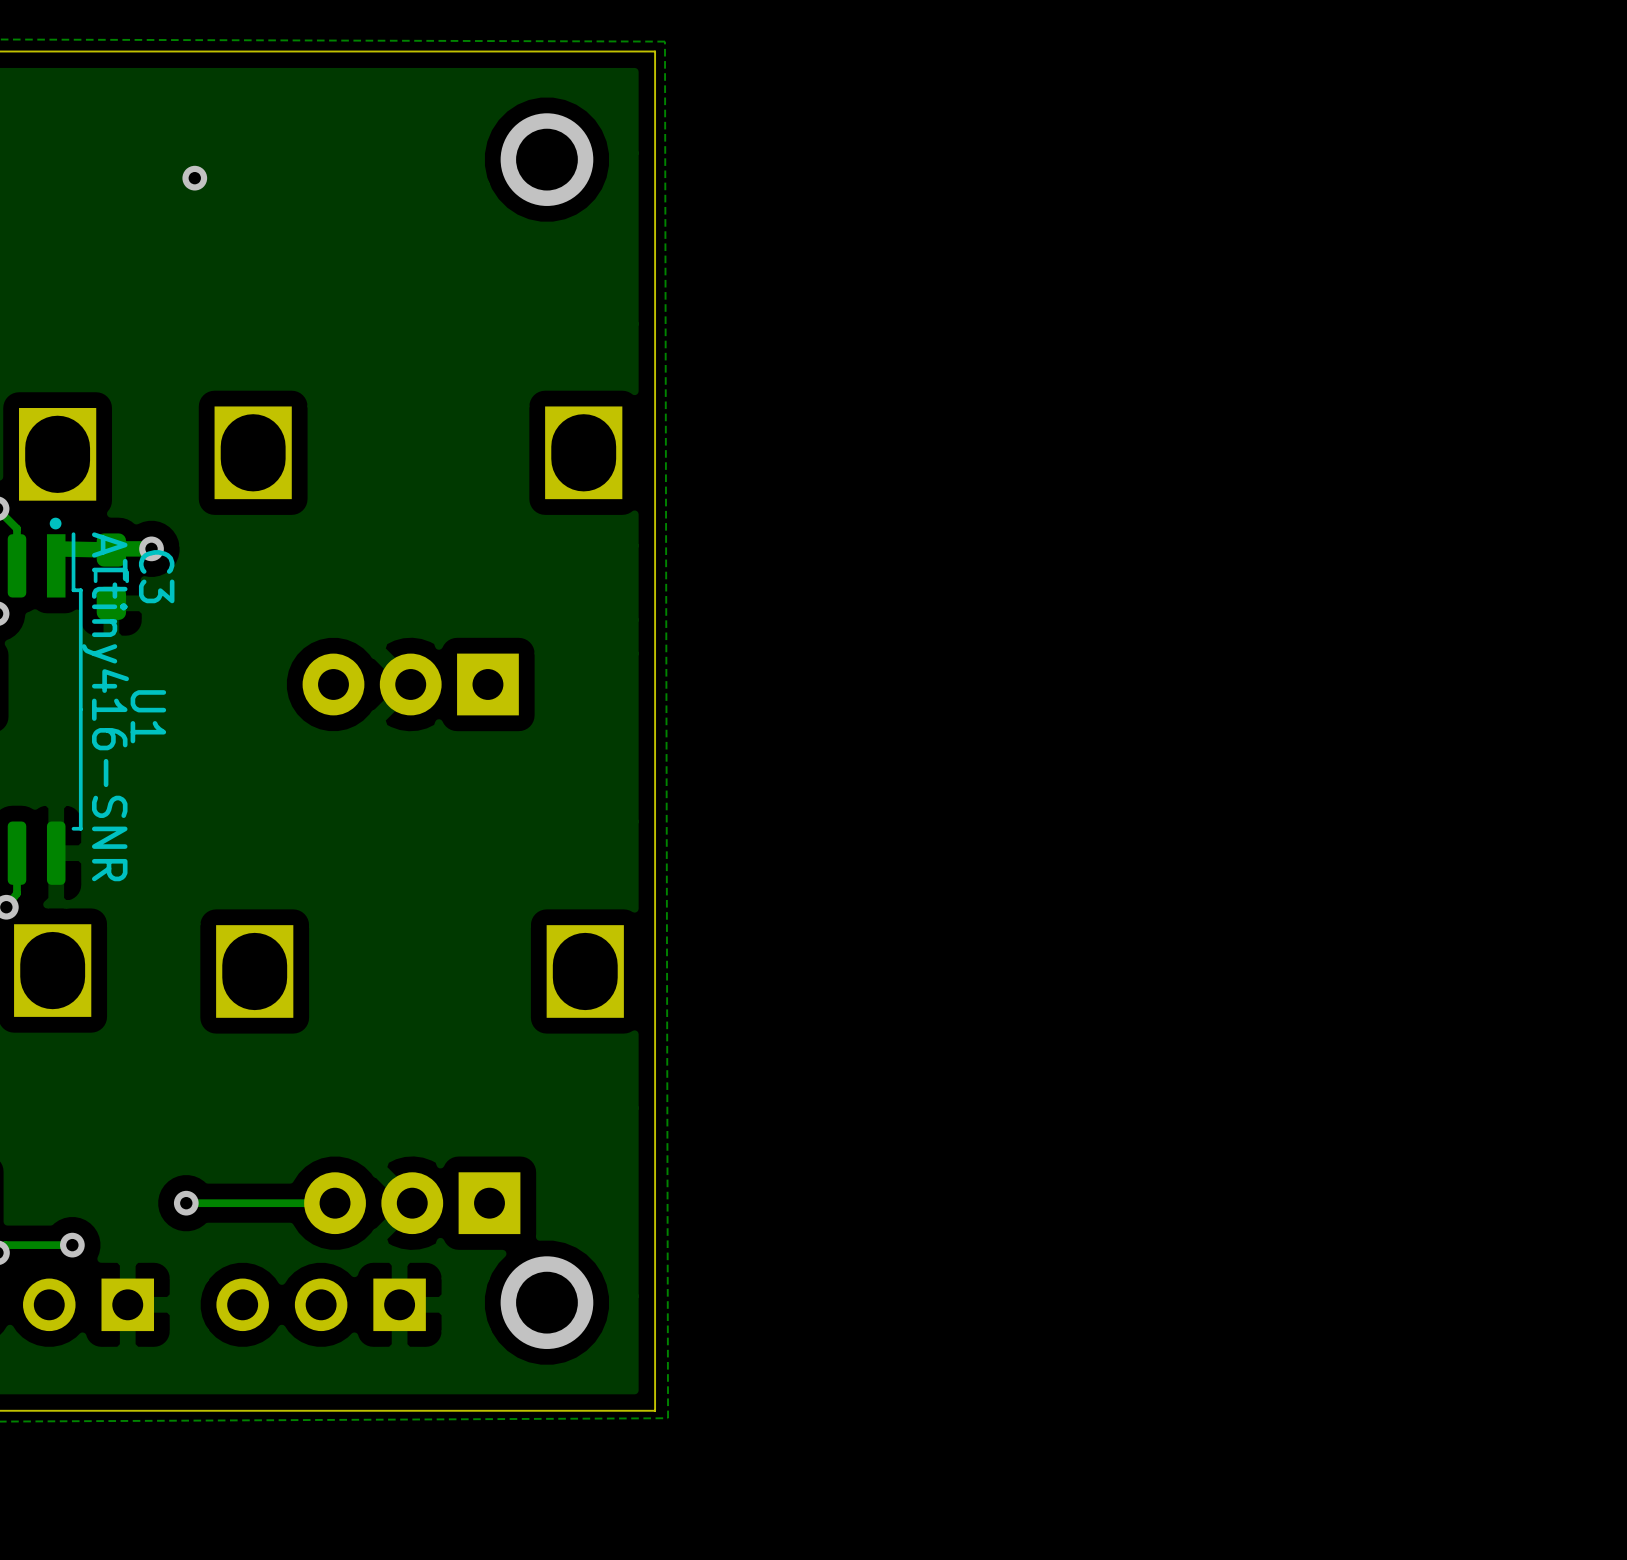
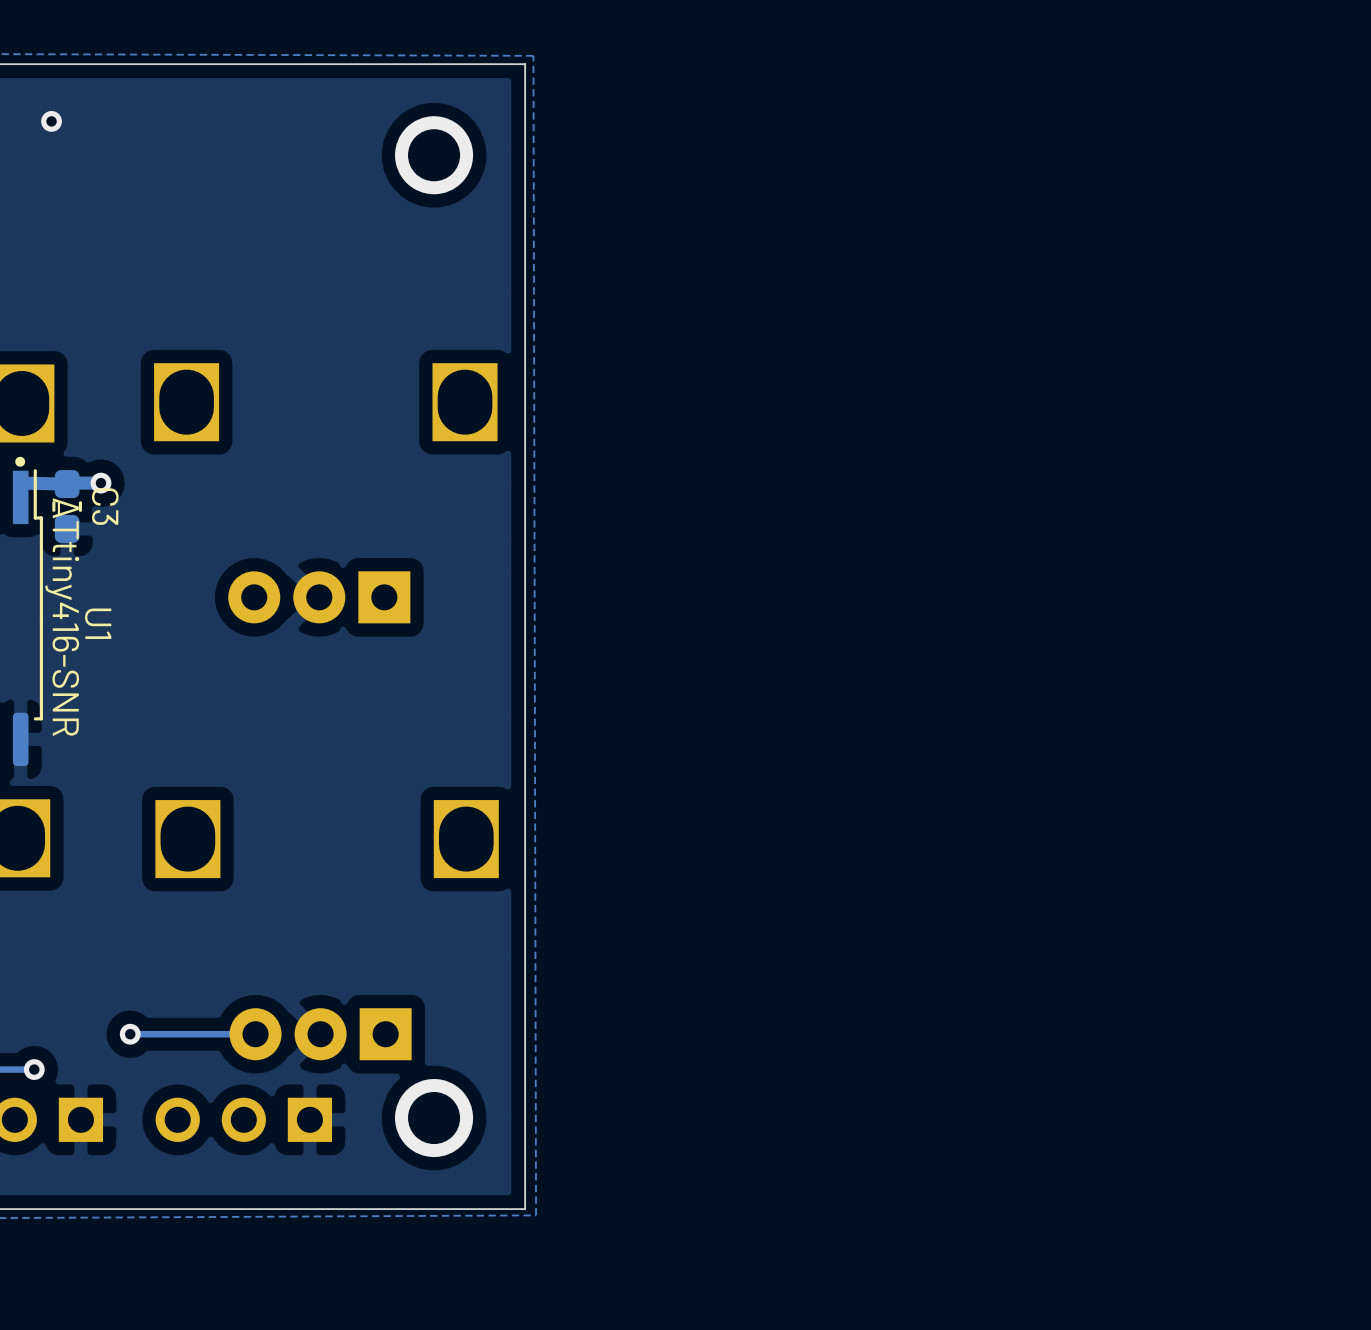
via position: (194, 178) -> (51, 121)

